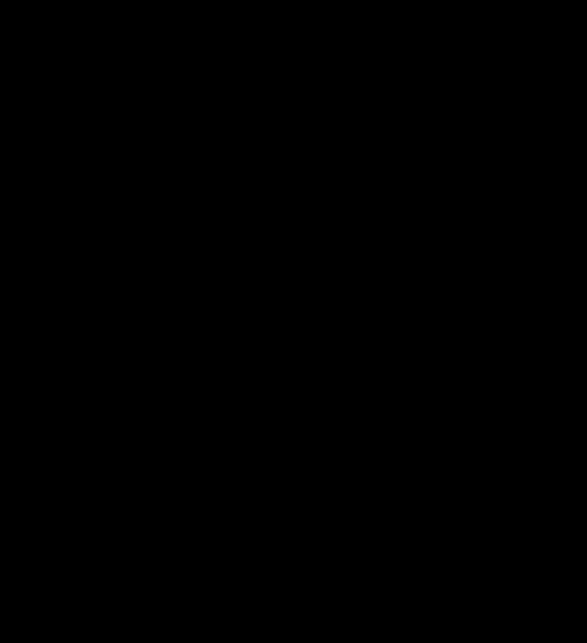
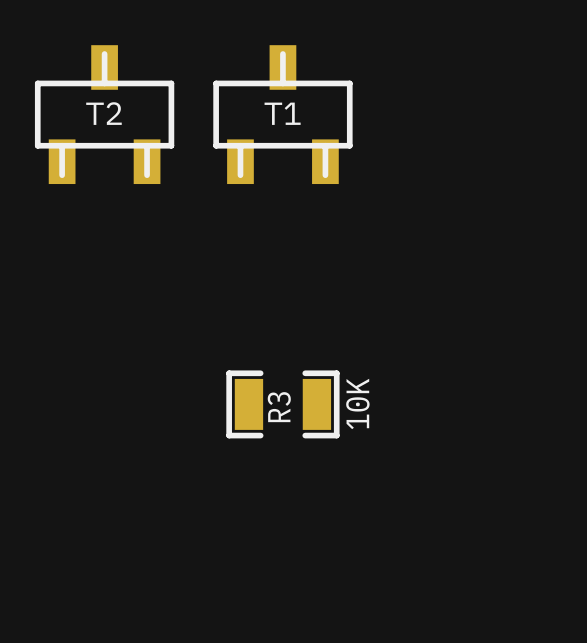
T2: none -> (104, 114)
T1: none -> (282, 114)
R3: none -> 10K (282, 404)

